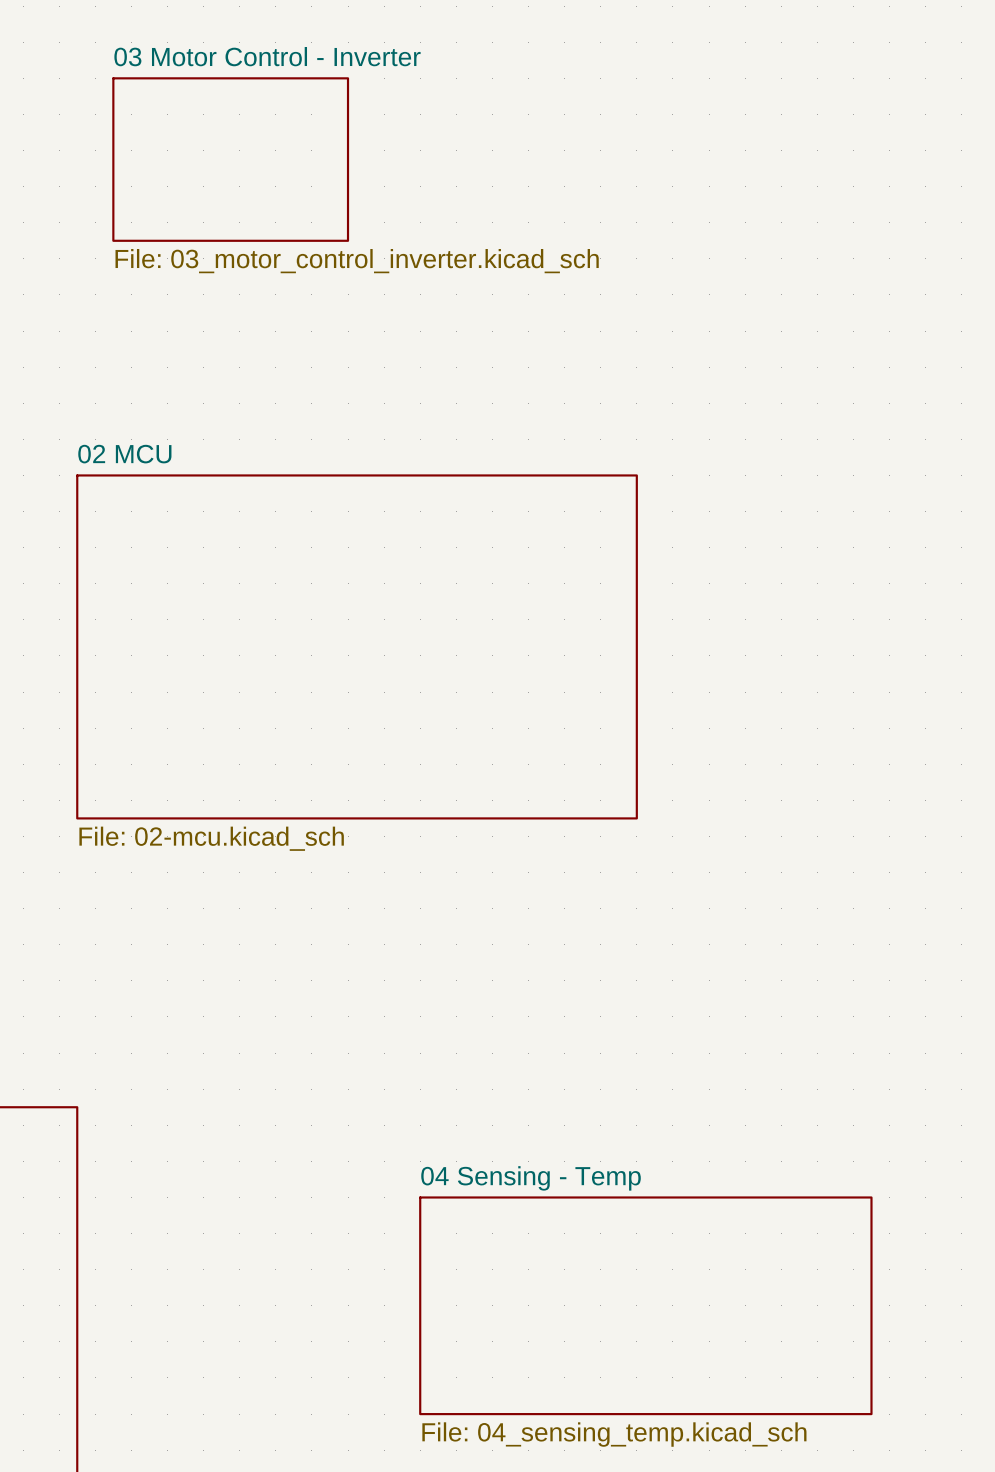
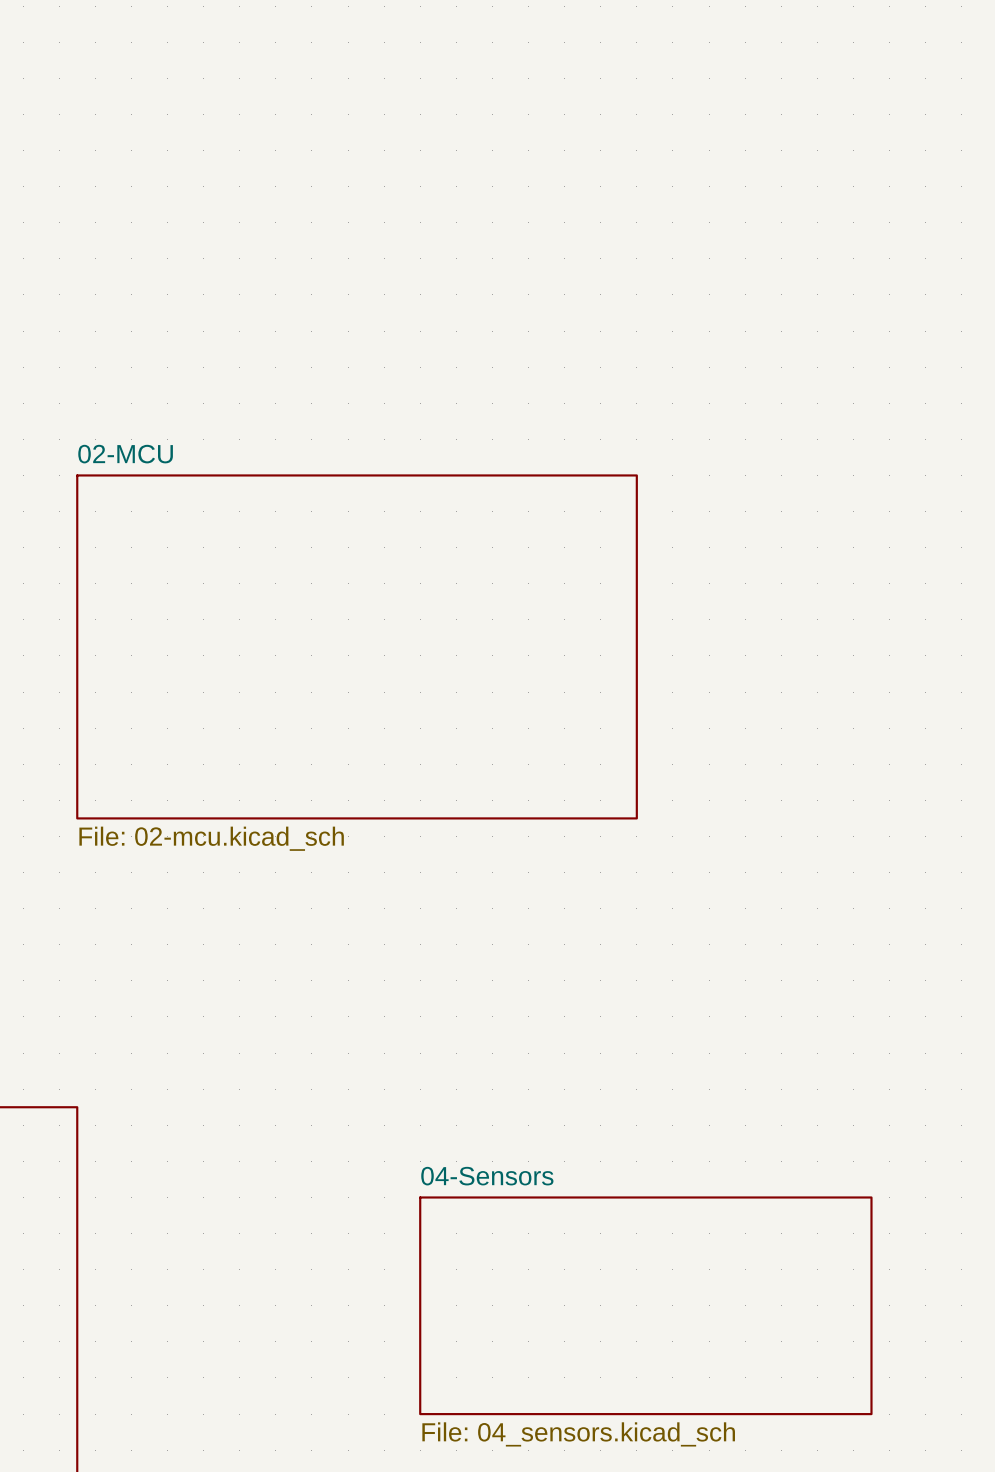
sheet 03 Motor Control - Inverter: File: 03_motor_control_inverter.kicad_sch (230, 159) -> none
sheet 02 MCU name: 02 MCU (124, 454) -> 02-MCU (125, 454)
sheet 04 Sensing - Temp name: 04 Sensing - Temp (531, 1178) -> 04-Sensors (487, 1176)
sheet 04 Sensing - Temp value: File: 04_sensing_temp.kicad_sch (614, 1434) -> File: 04_sensors.kicad_sch (578, 1434)

